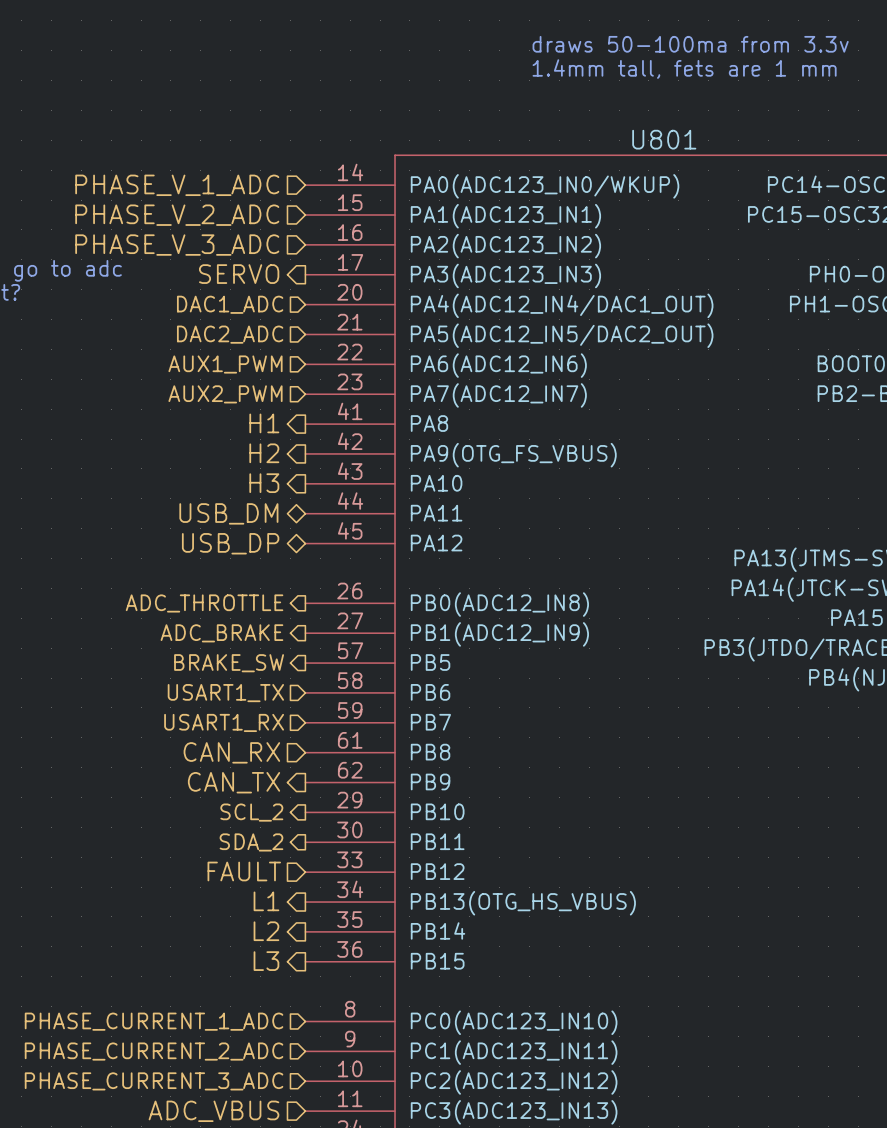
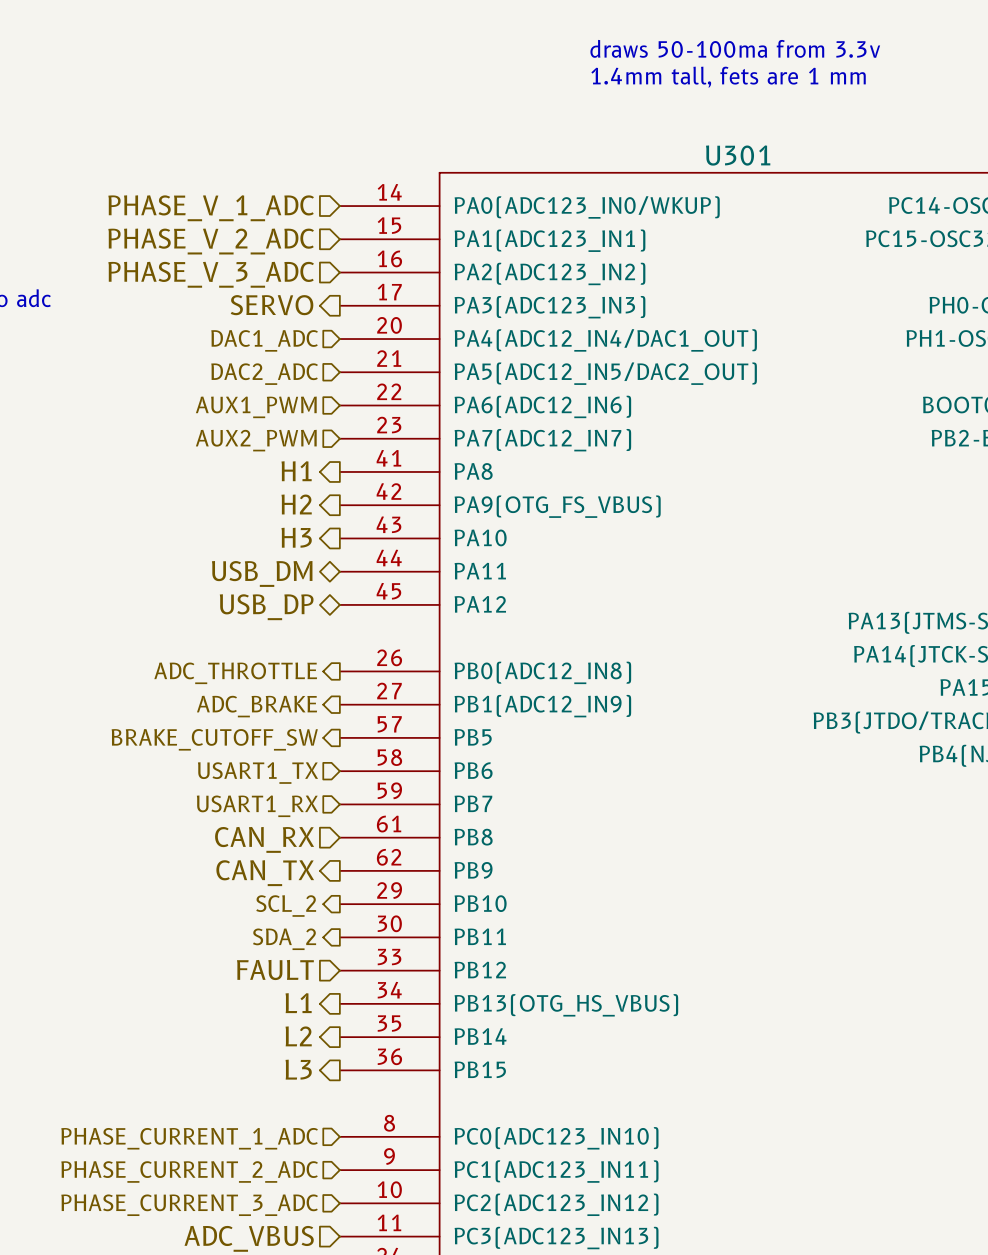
U801 name: U801 (664, 139) -> U301 (738, 155)
hierarchical label: BRAKE_SW (229, 663) -> BRAKE_CUTOFF_SW (214, 739)

